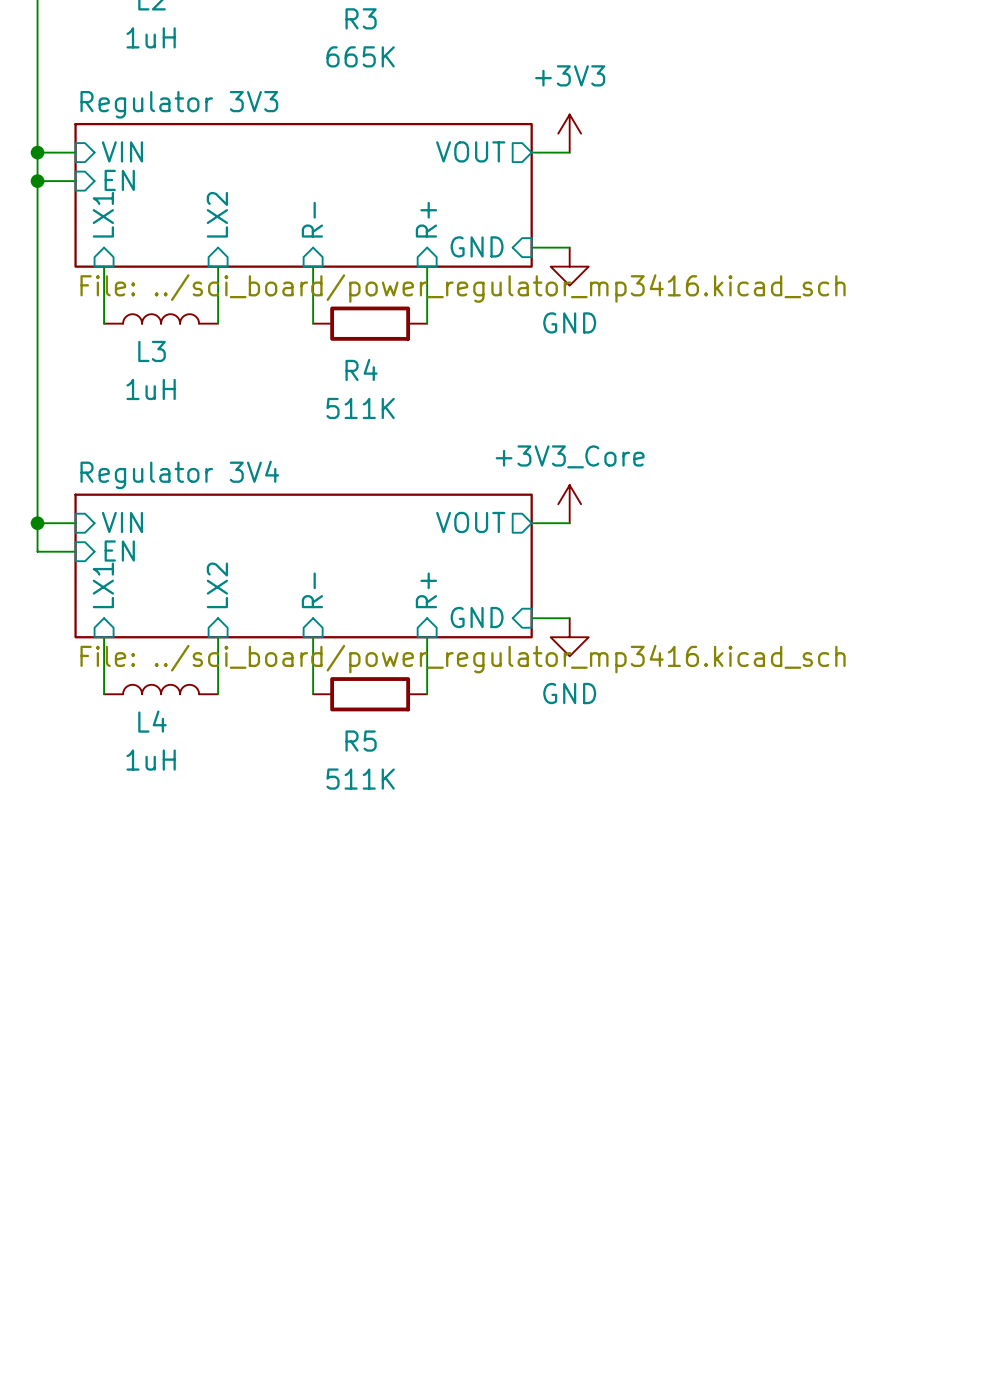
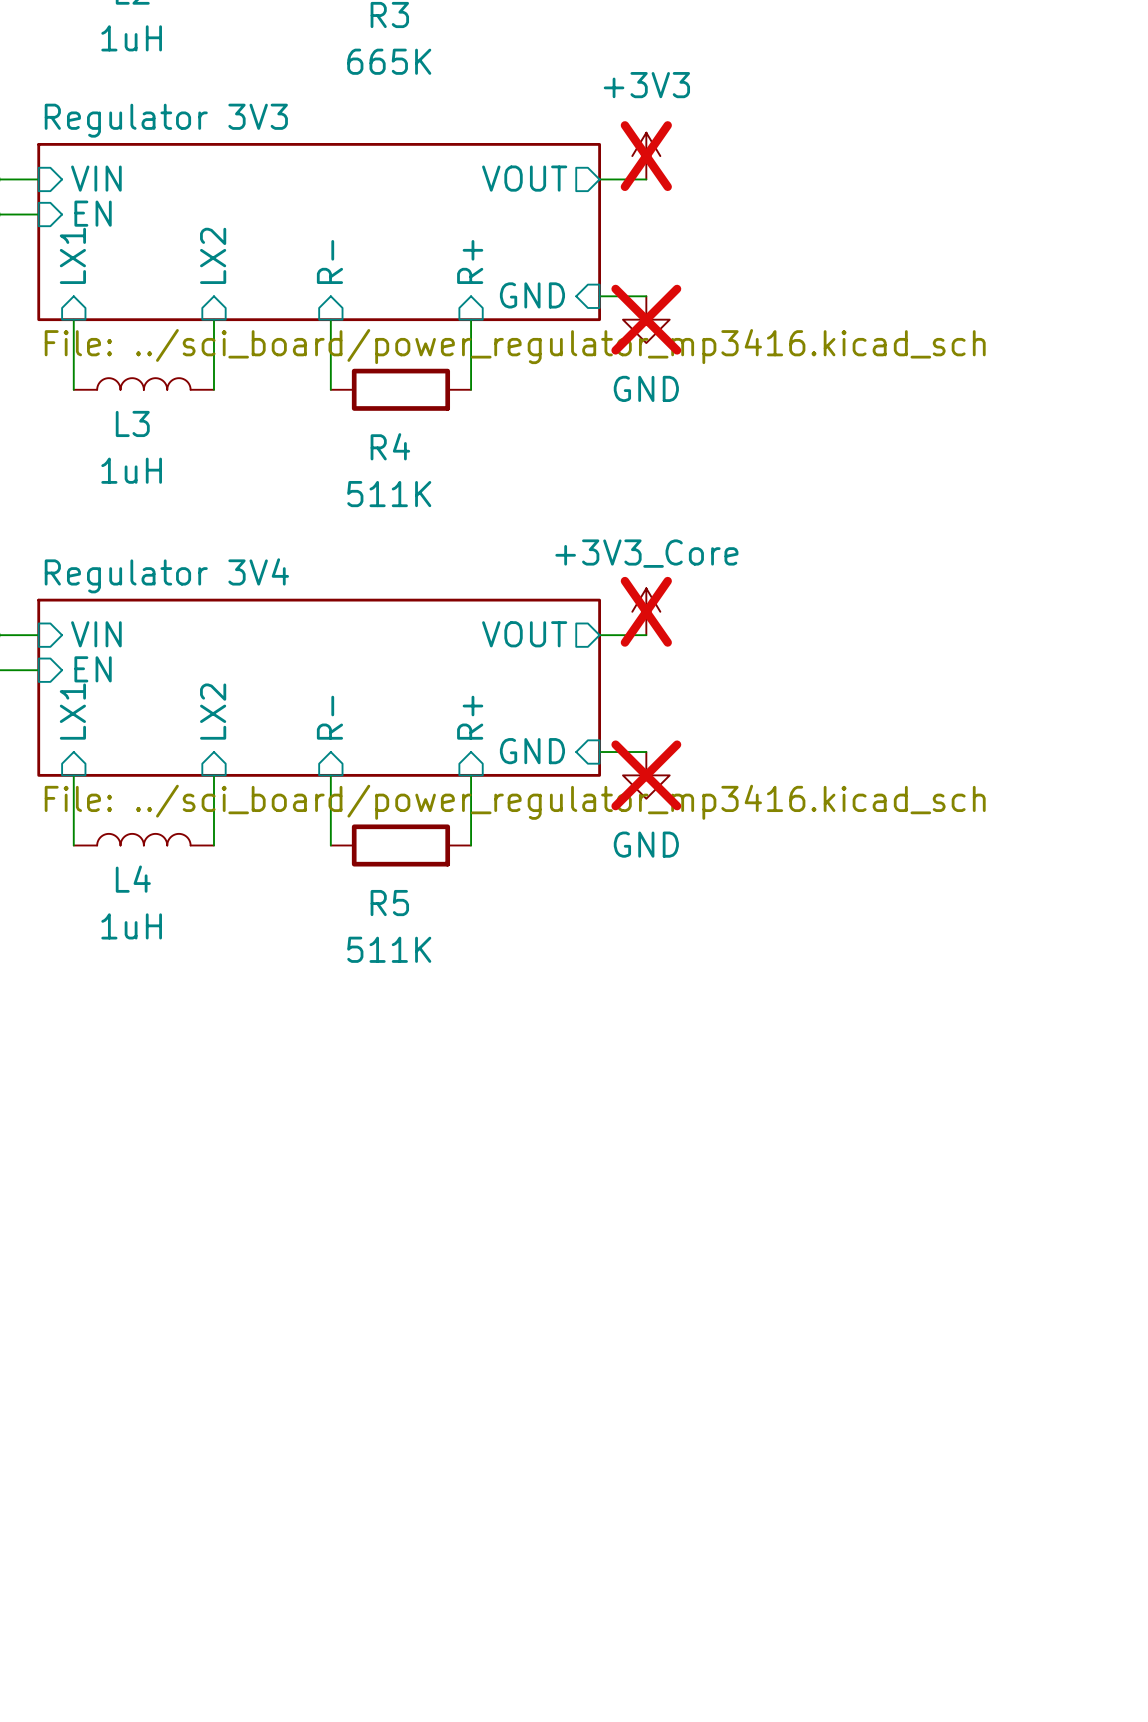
power symbol do-not-place cross: none -> (646, 156)
power symbol do-not-place cross: none -> (646, 319)
power symbol do-not-place cross: none -> (646, 611)
power symbol do-not-place cross: none -> (646, 775)

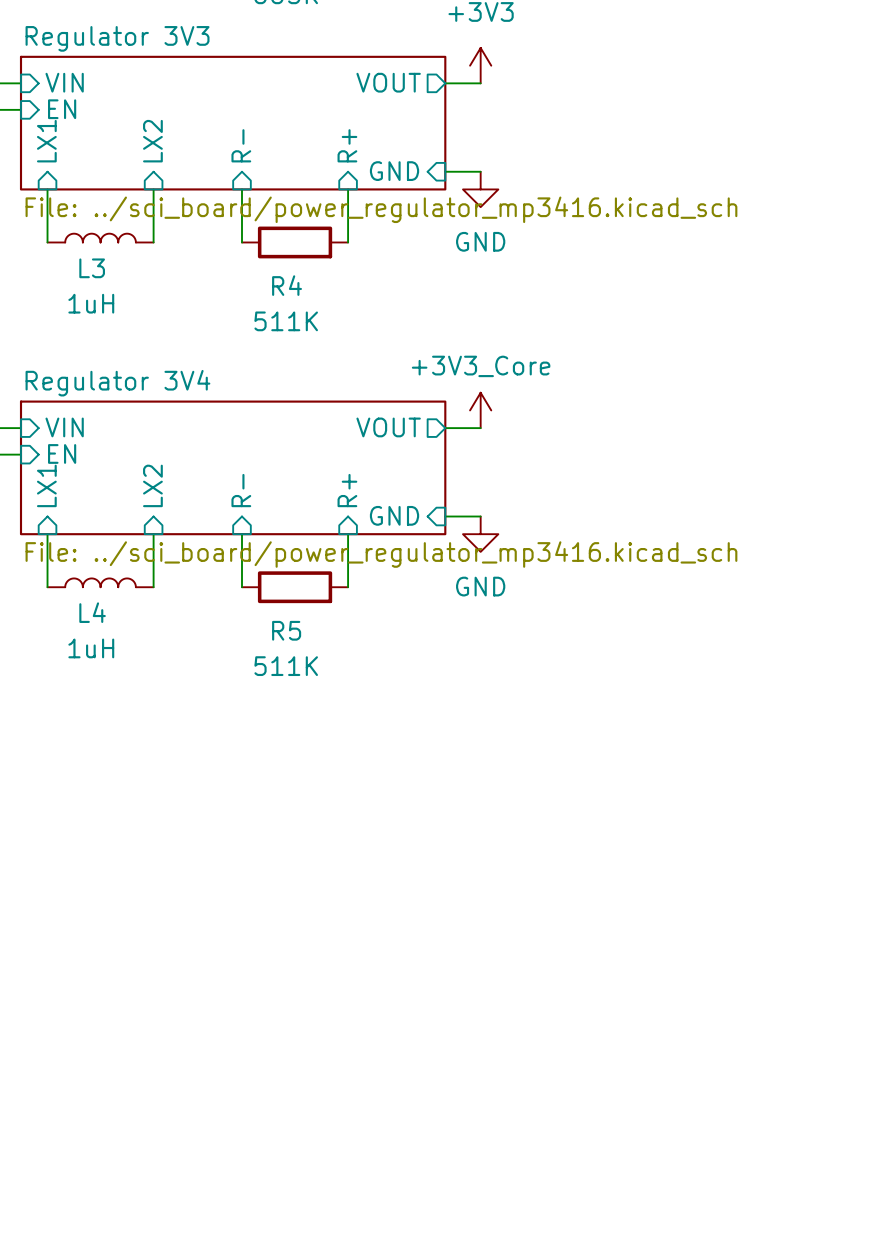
power symbol do-not-place cross: (646, 156) -> none
power symbol do-not-place cross: (646, 319) -> none
power symbol do-not-place cross: (646, 611) -> none
power symbol do-not-place cross: (646, 775) -> none

